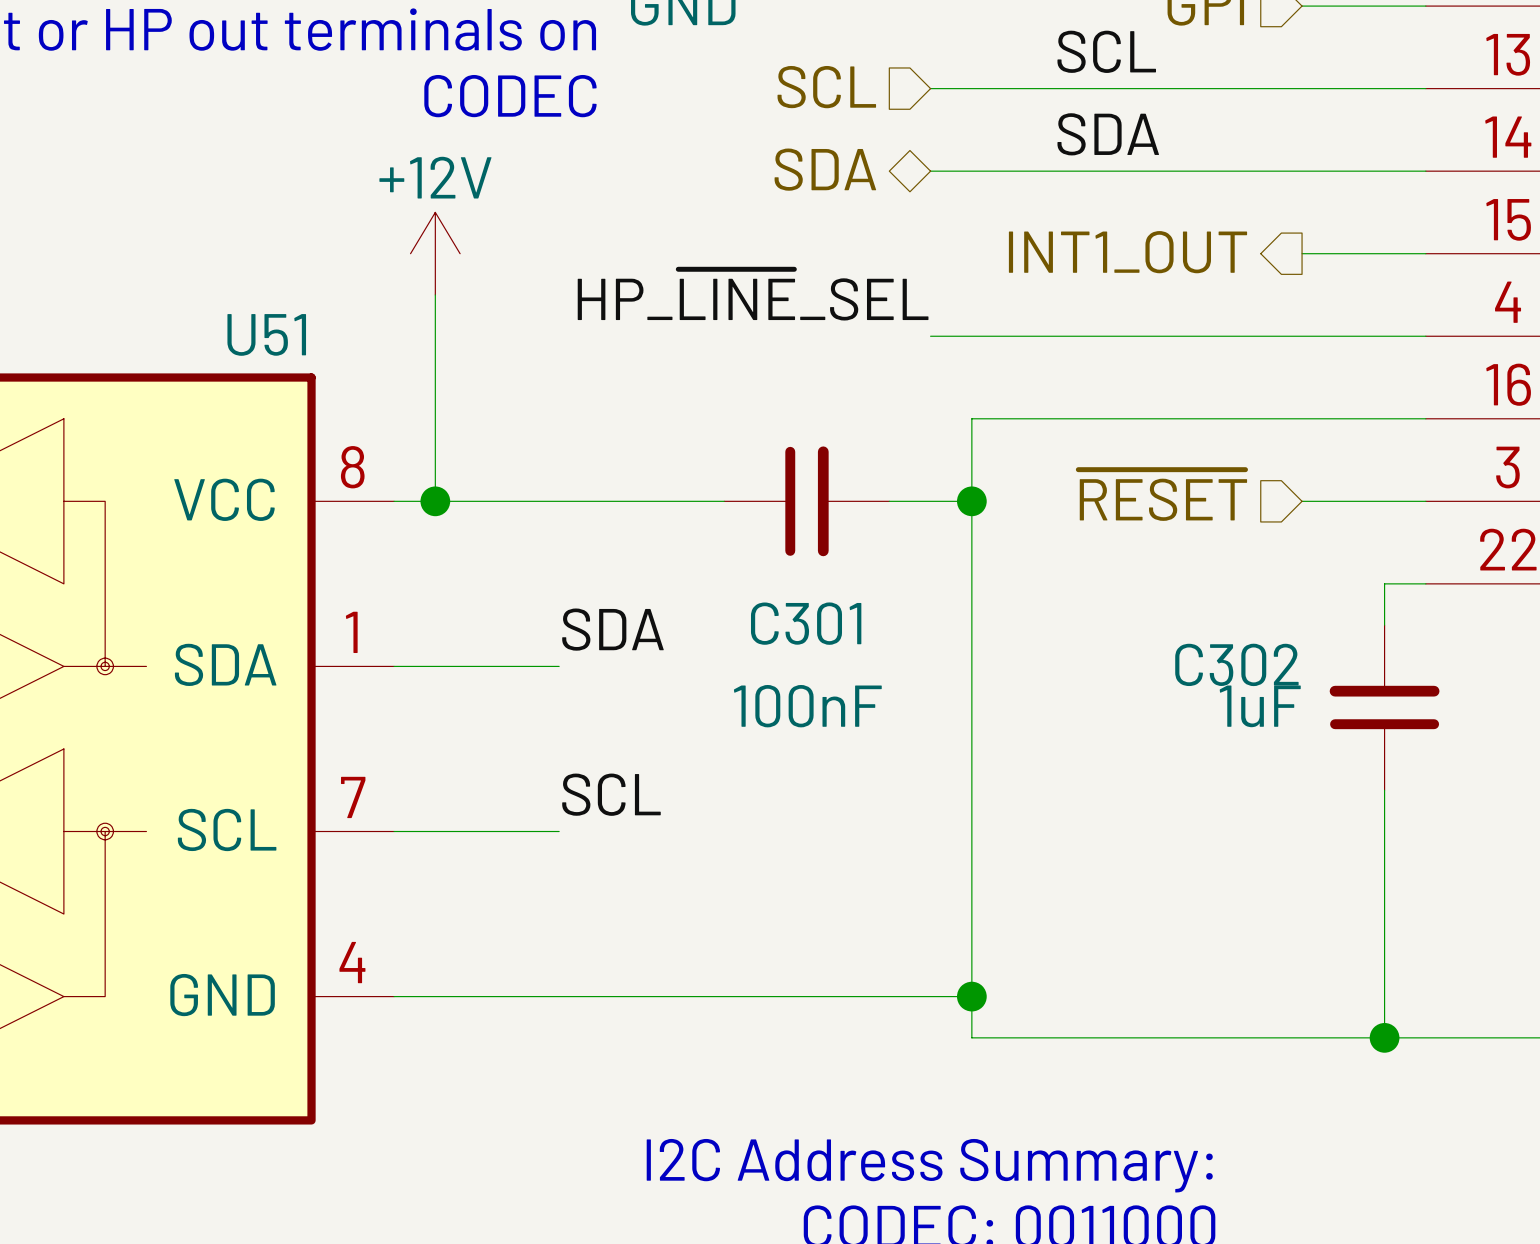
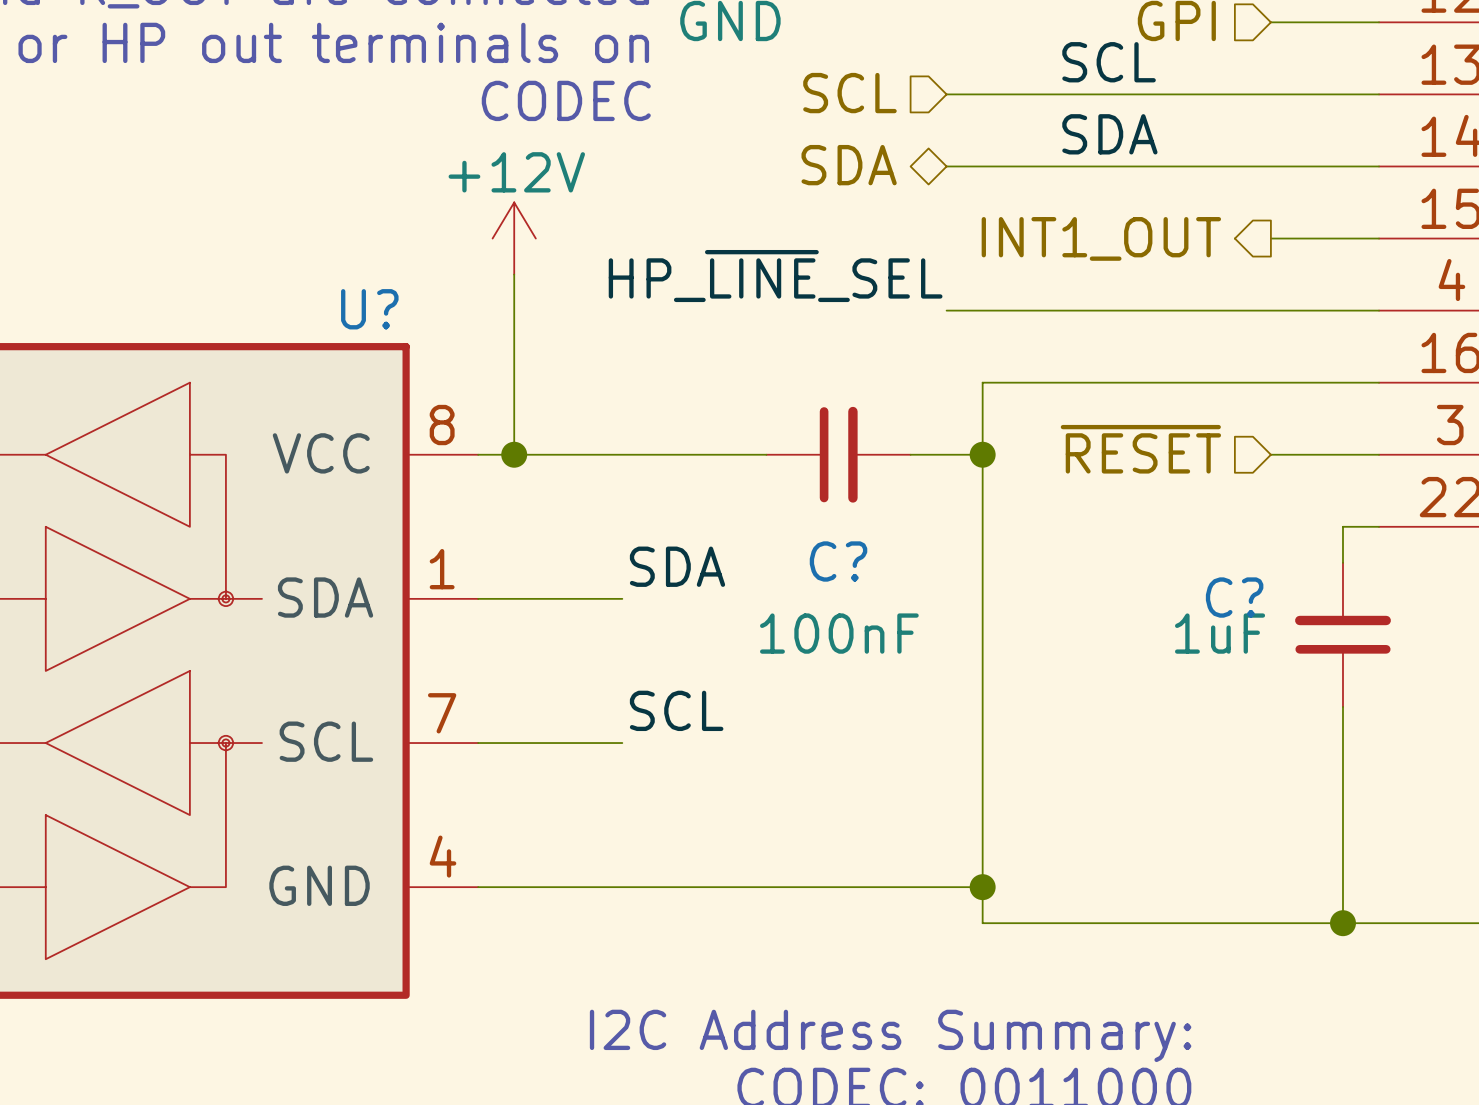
U51 name: U51 (266, 334) -> U? (369, 309)
C301 name: C301 (806, 623) -> C? (838, 561)
C302 name: C302 (1236, 664) -> C? (1234, 597)

